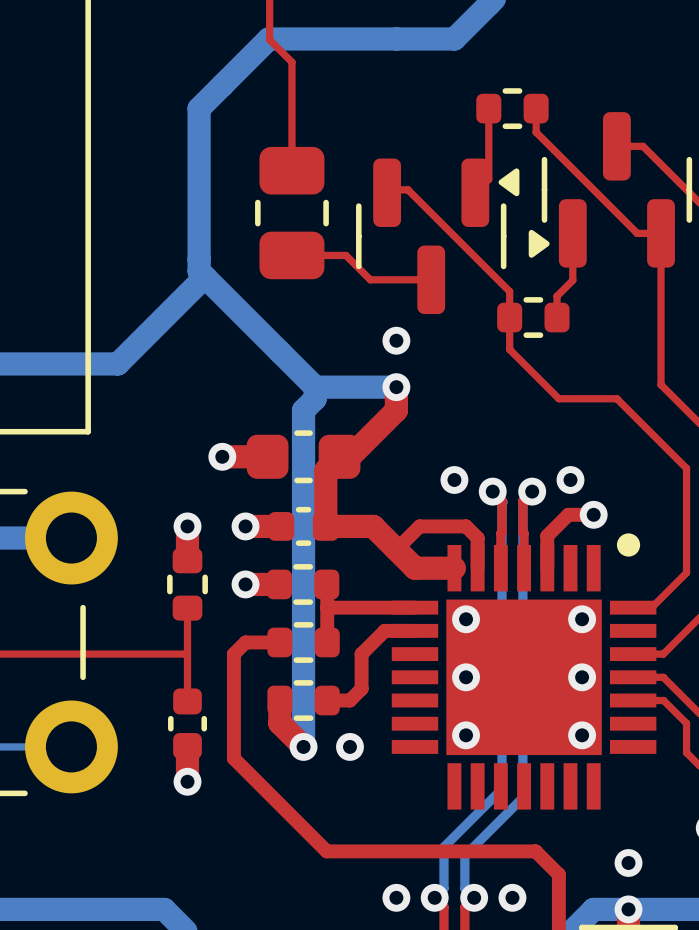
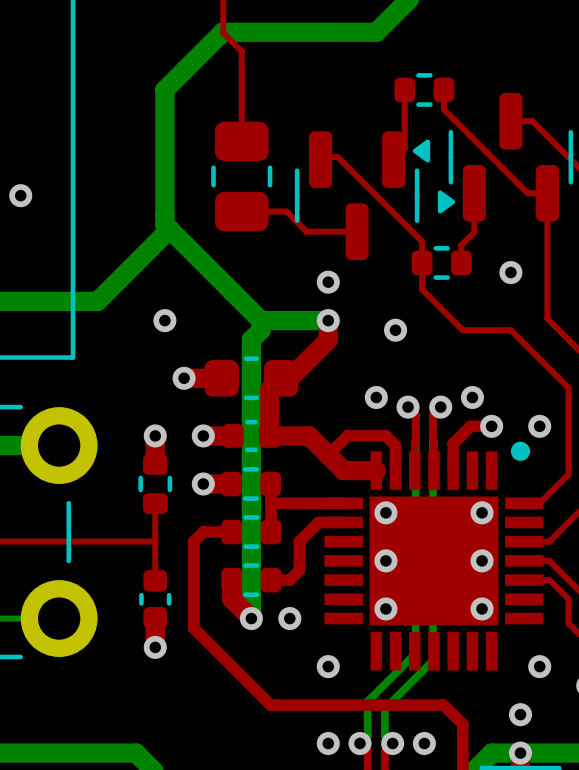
via: none -> (20, 195)
via: none -> (510, 272)
via: none -> (164, 320)
via: none -> (395, 330)
via: none -> (539, 426)
via: none -> (328, 666)
via: none -> (539, 666)

